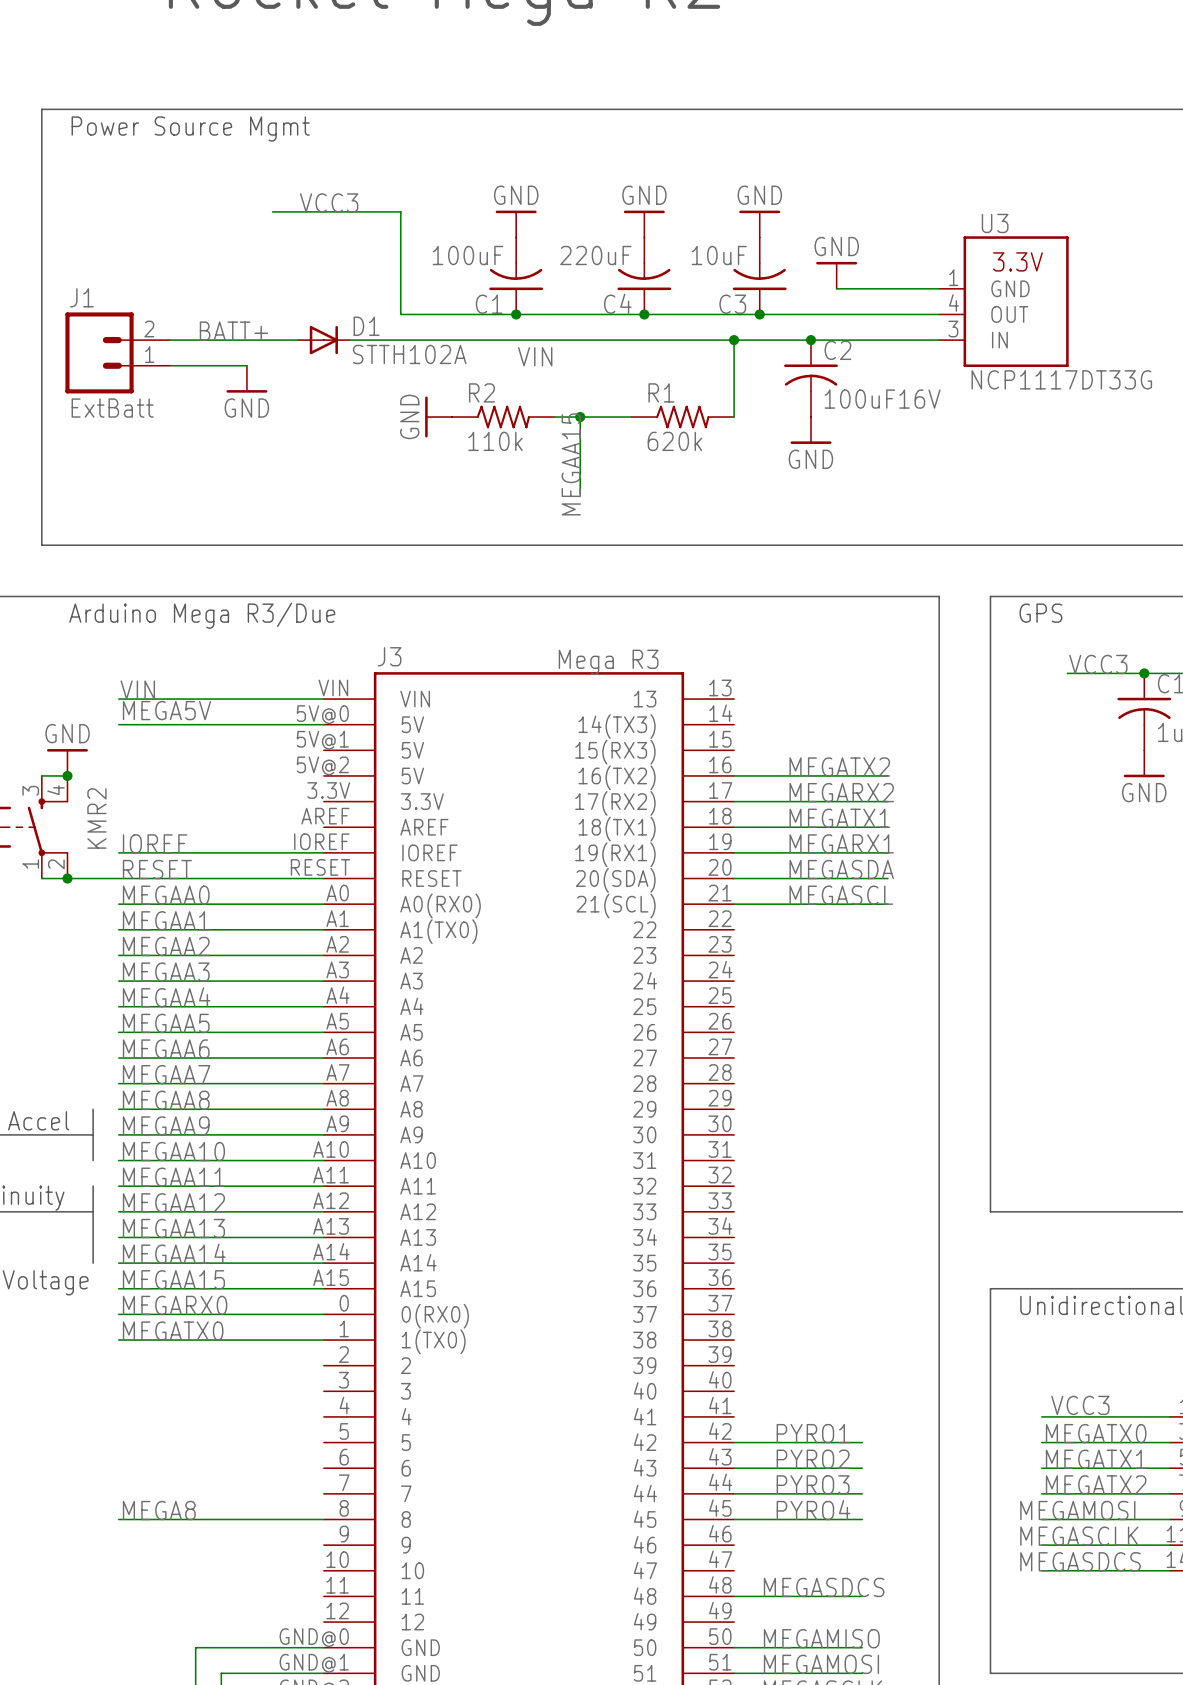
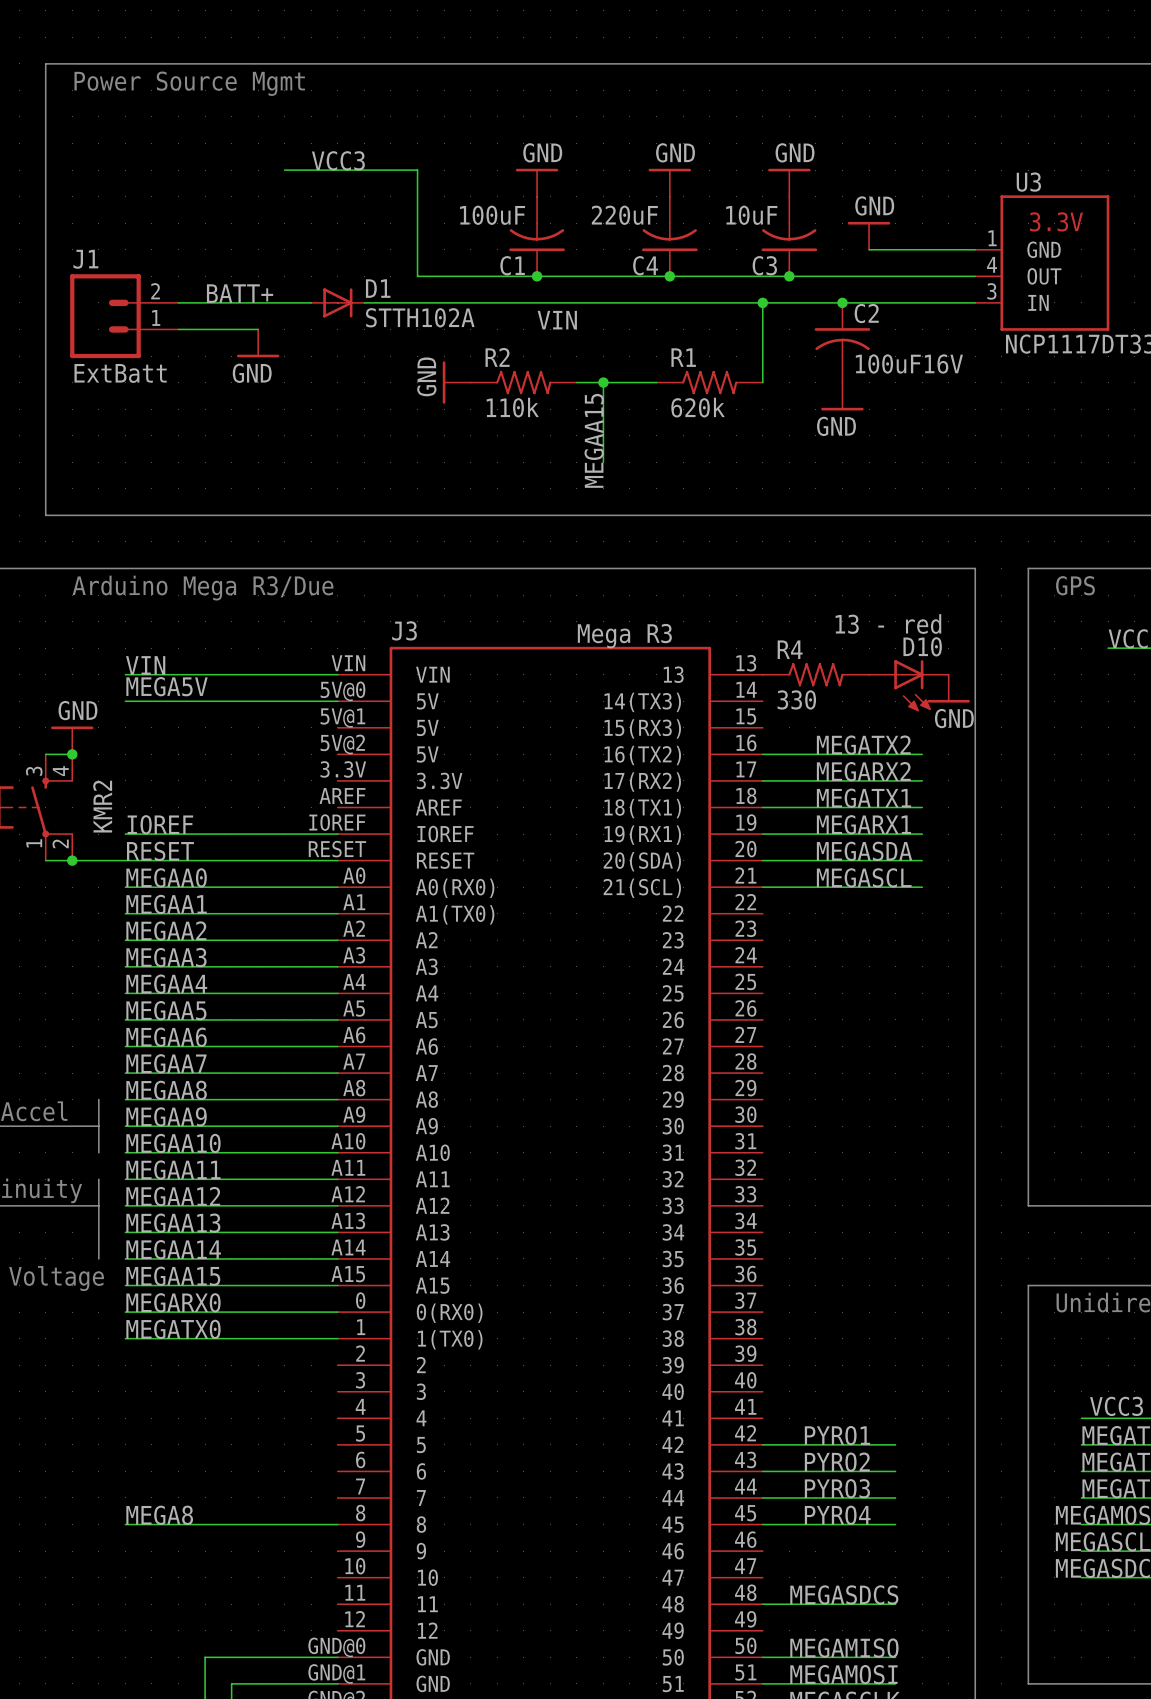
R4: none -> 330 (815, 674)
D10: none -> 13 - red (908, 685)
power symbol: none -> GND (948, 688)

